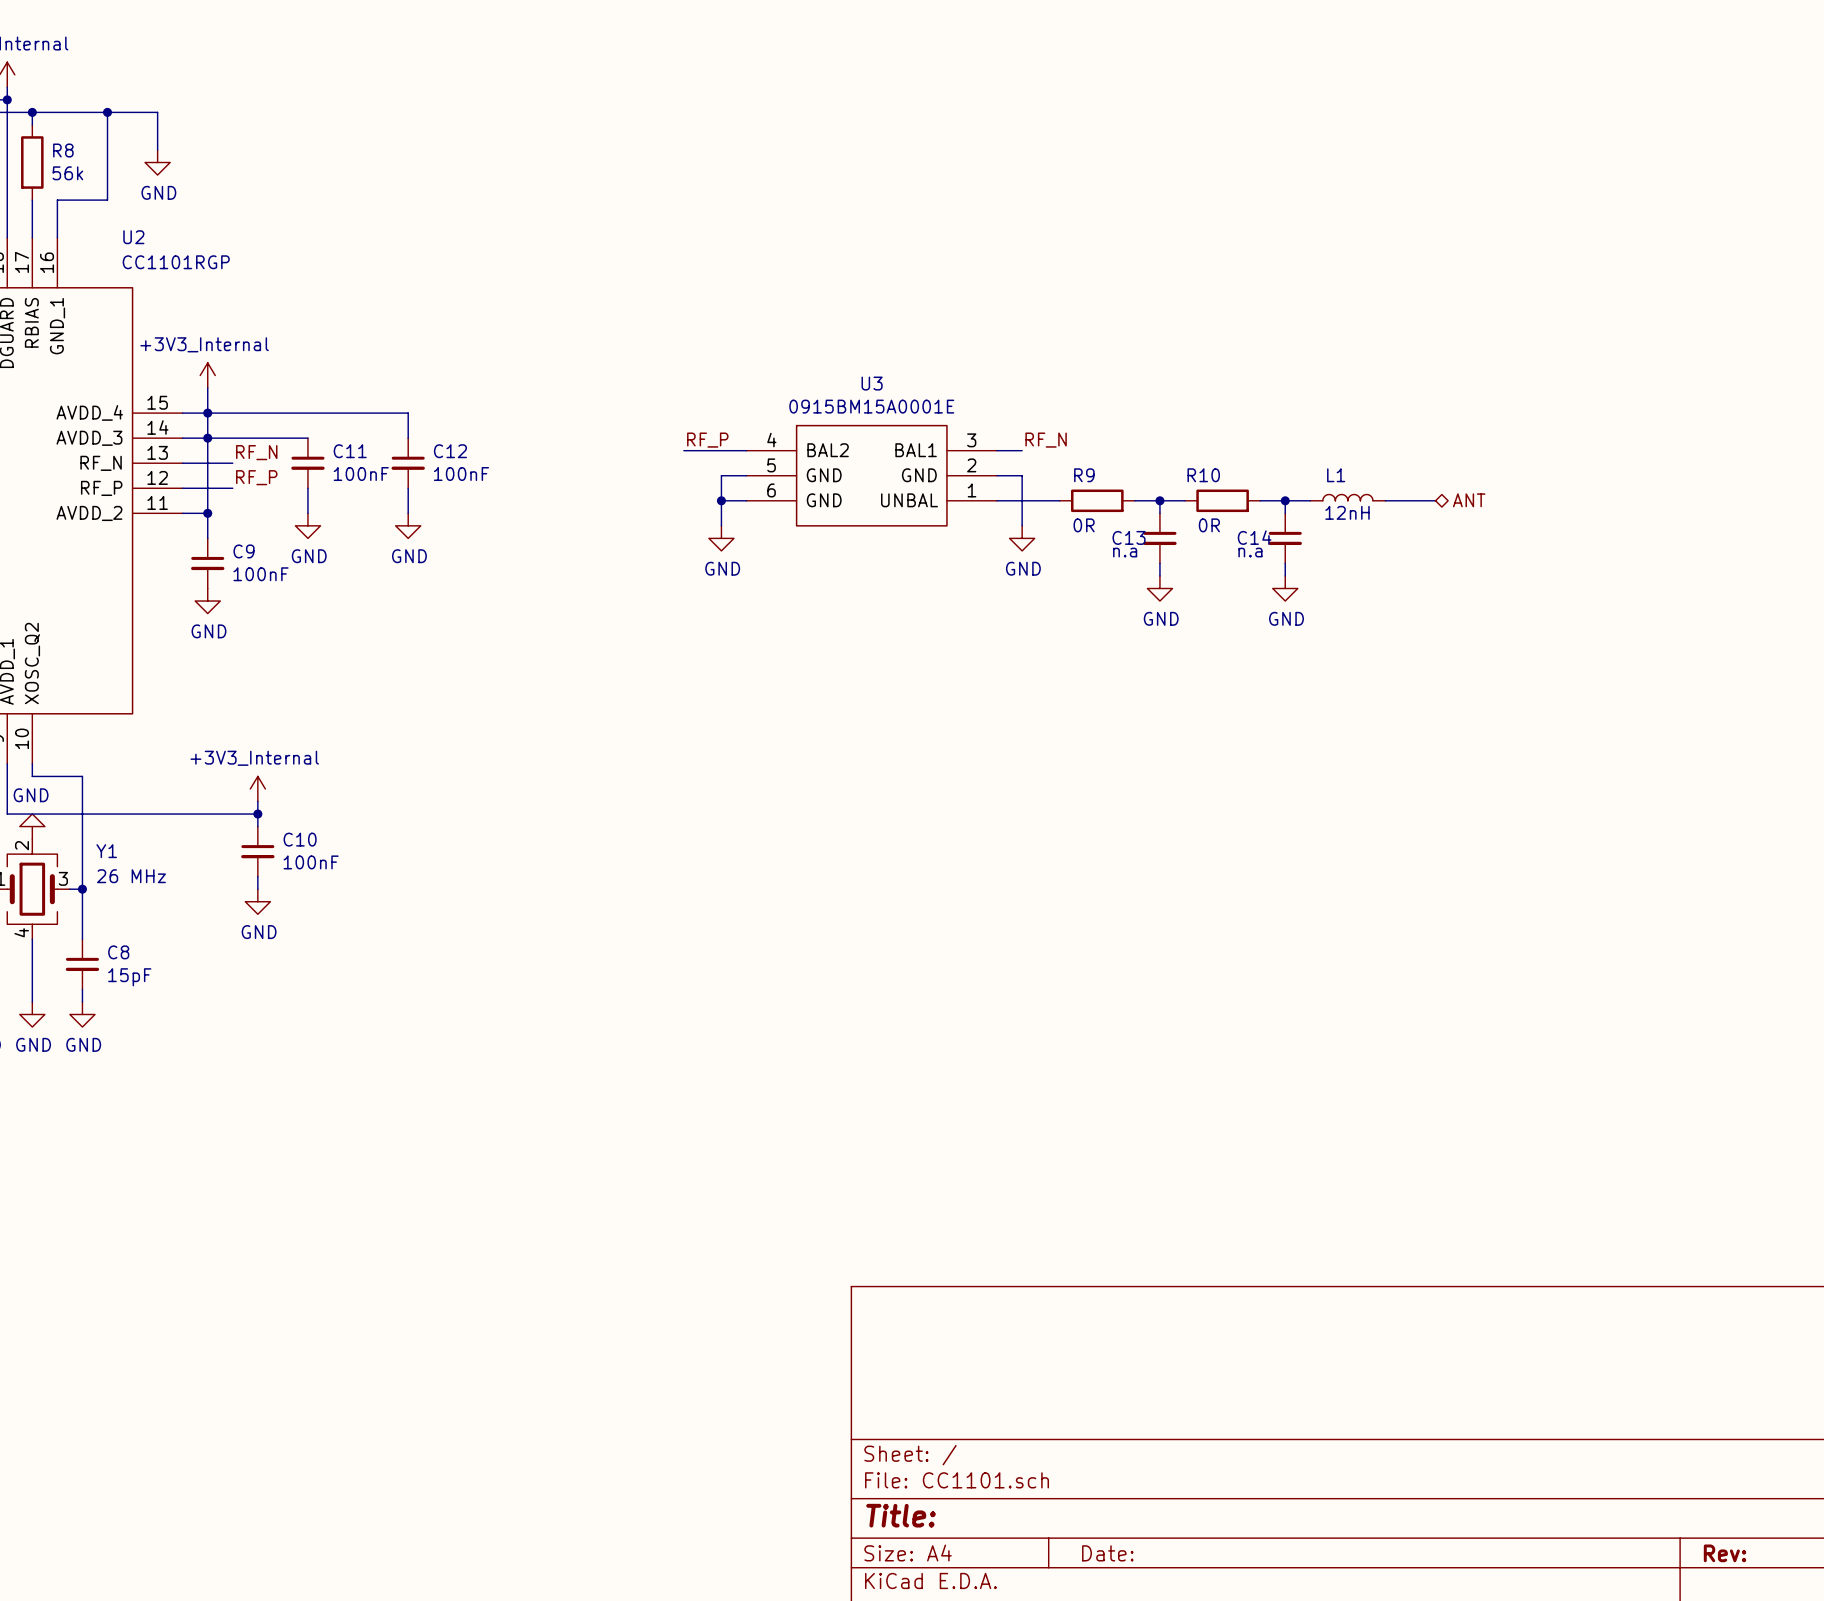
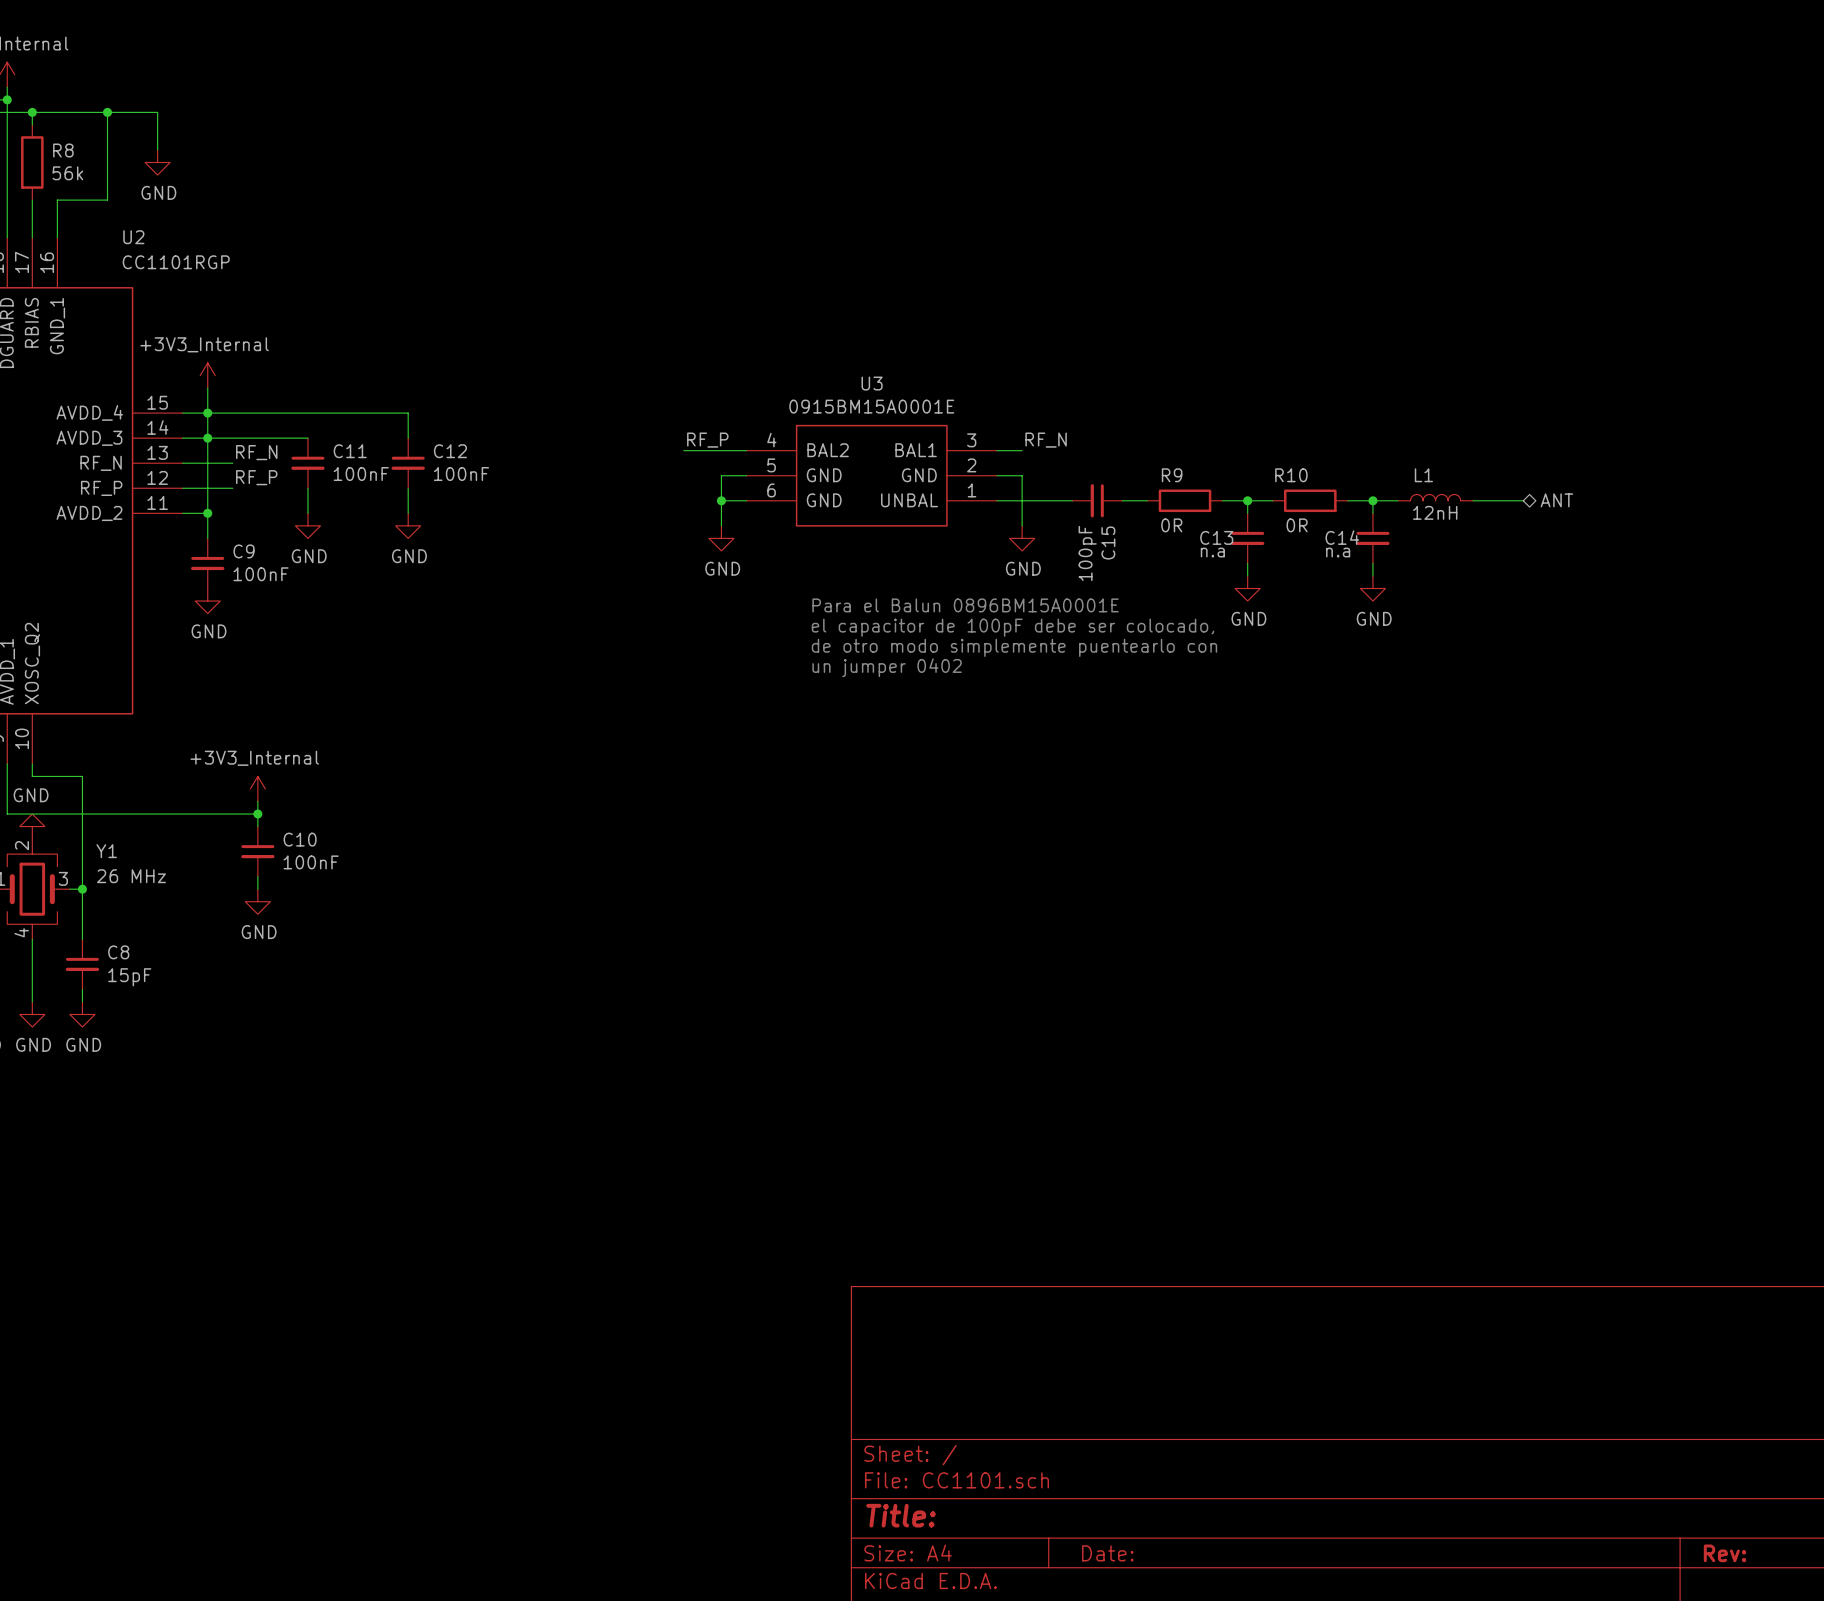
L1 position: (1347, 497) -> (1435, 497)
R9 position: (1097, 500) -> (1185, 500)
C15: none -> 100pF (1097, 500)
wire: (1147, 500) (1185, 500) -> none
junction: (1159, 500) -> none
R10 position: (1222, 500) -> (1310, 500)
wire: (1272, 500) (1310, 500) -> (1222, 500) (1260, 500)
junction position: (1285, 500) -> (1247, 500)
junction: none -> (1372, 500)
wire: (1398, 500) (1435, 500) -> (1347, 500) (1385, 500)
hierarchical label position: ANT (1469, 500) -> ANT (1556, 500)
wire: none -> (1473, 500) (1523, 500)
C13 position: (1159, 538) -> (1247, 538)
C14 position: (1285, 538) -> (1372, 538)
wire: (1159, 563) (1159, 575) -> (1247, 563) (1247, 575)
wire: (1285, 563) (1285, 575) -> (1372, 563) (1372, 575)
power symbol: GND (1159, 588) -> none
power symbol position: GND (1285, 588) -> GND (1247, 588)
power symbol: none -> GND (1372, 588)
text: none -> Para el Balun 0896BM15A0001E (965, 605)
text: none -> el capacitor de 100pF debe ser colocado, (1012, 627)
text: none -> de otro modo simplemente puentearlo con (1014, 647)
text: none -> un jumper 0402 (887, 667)

